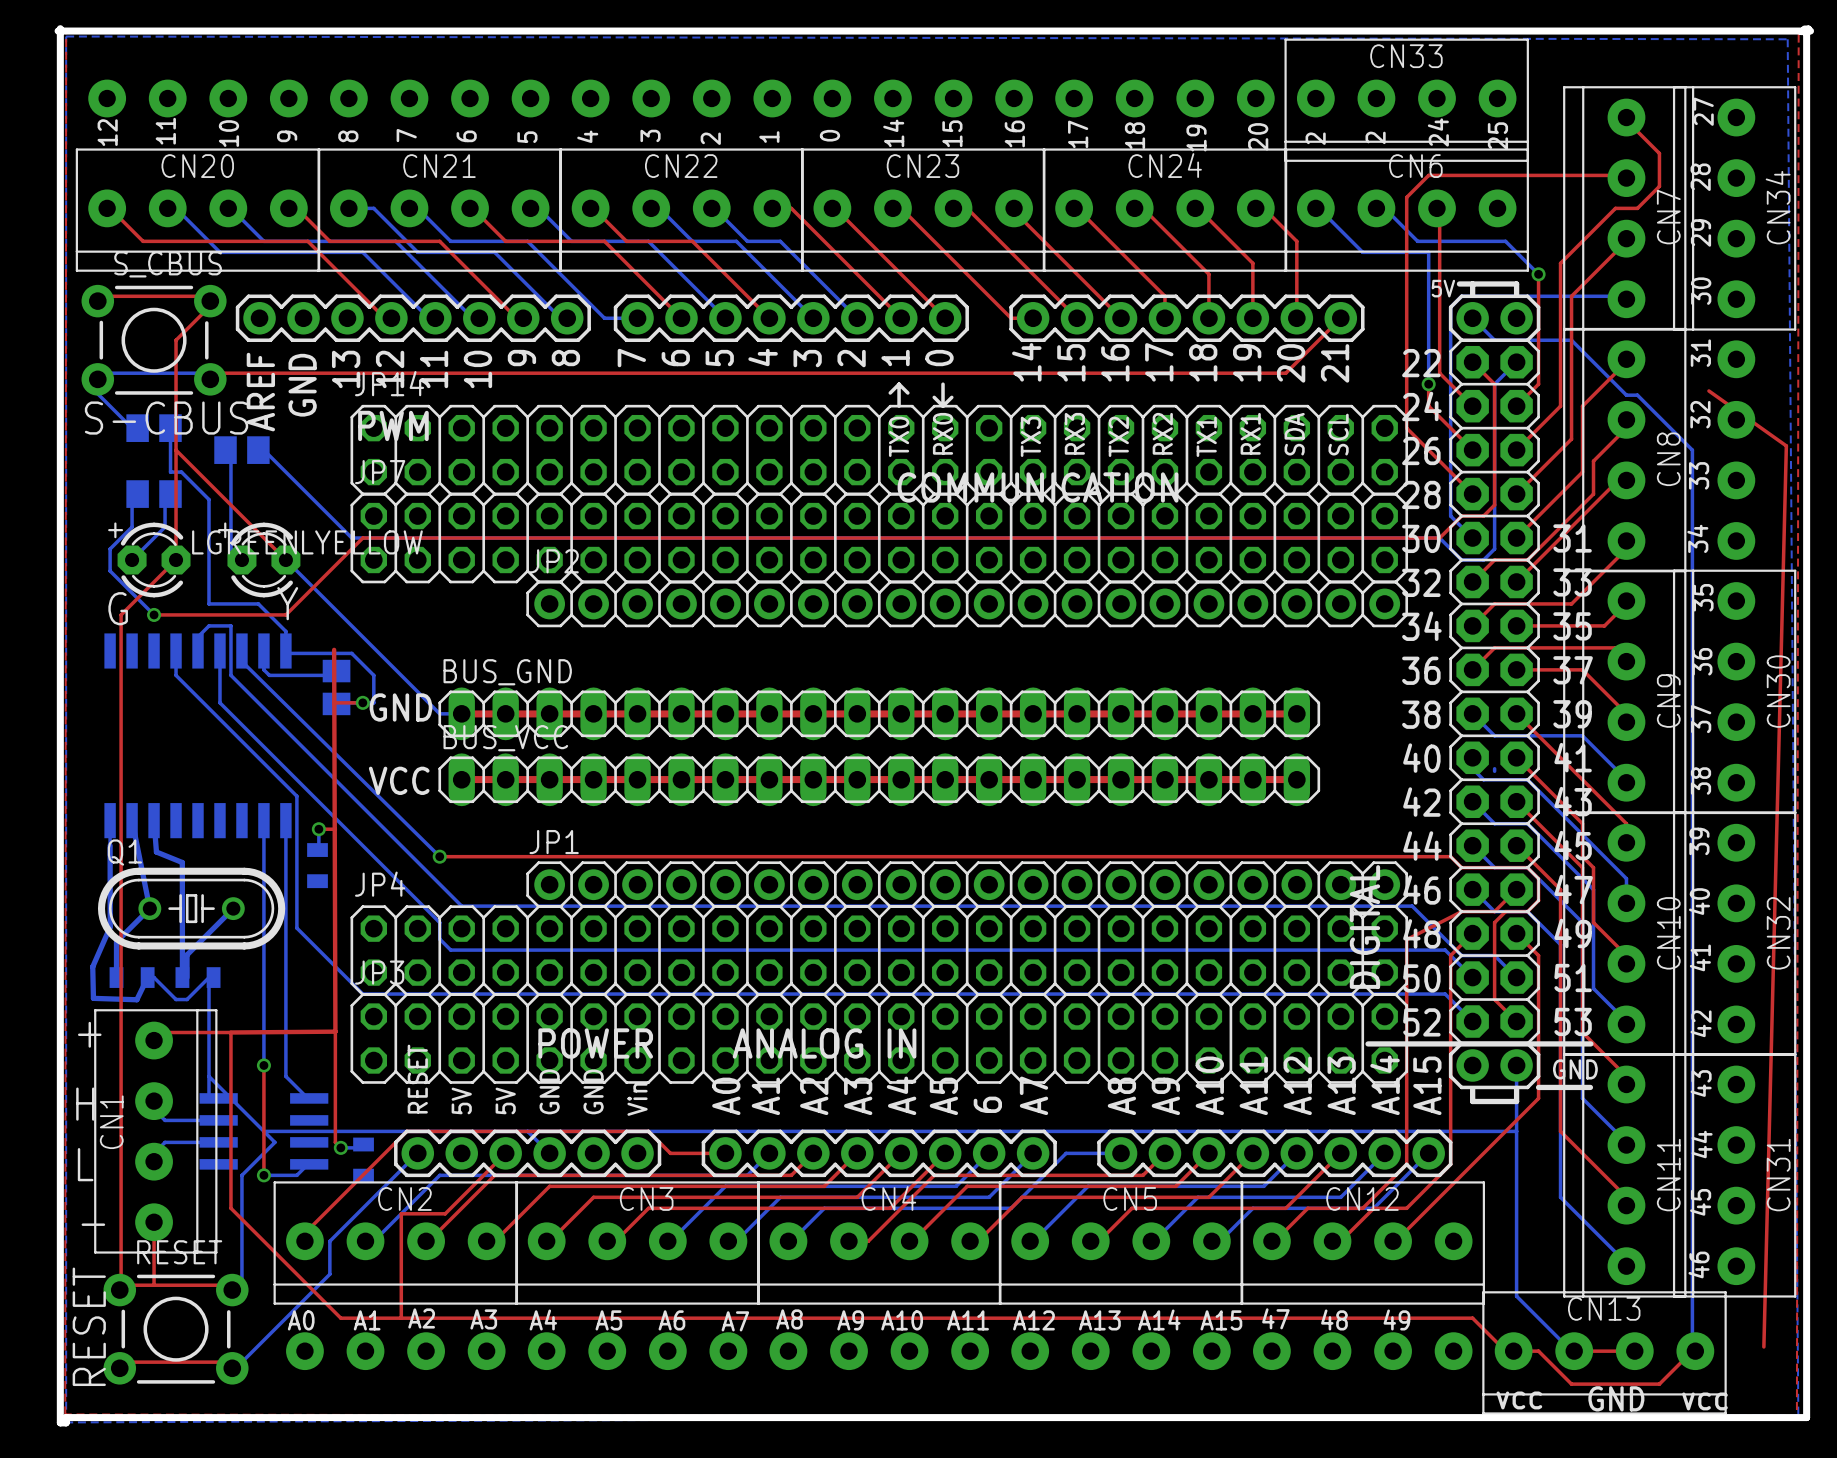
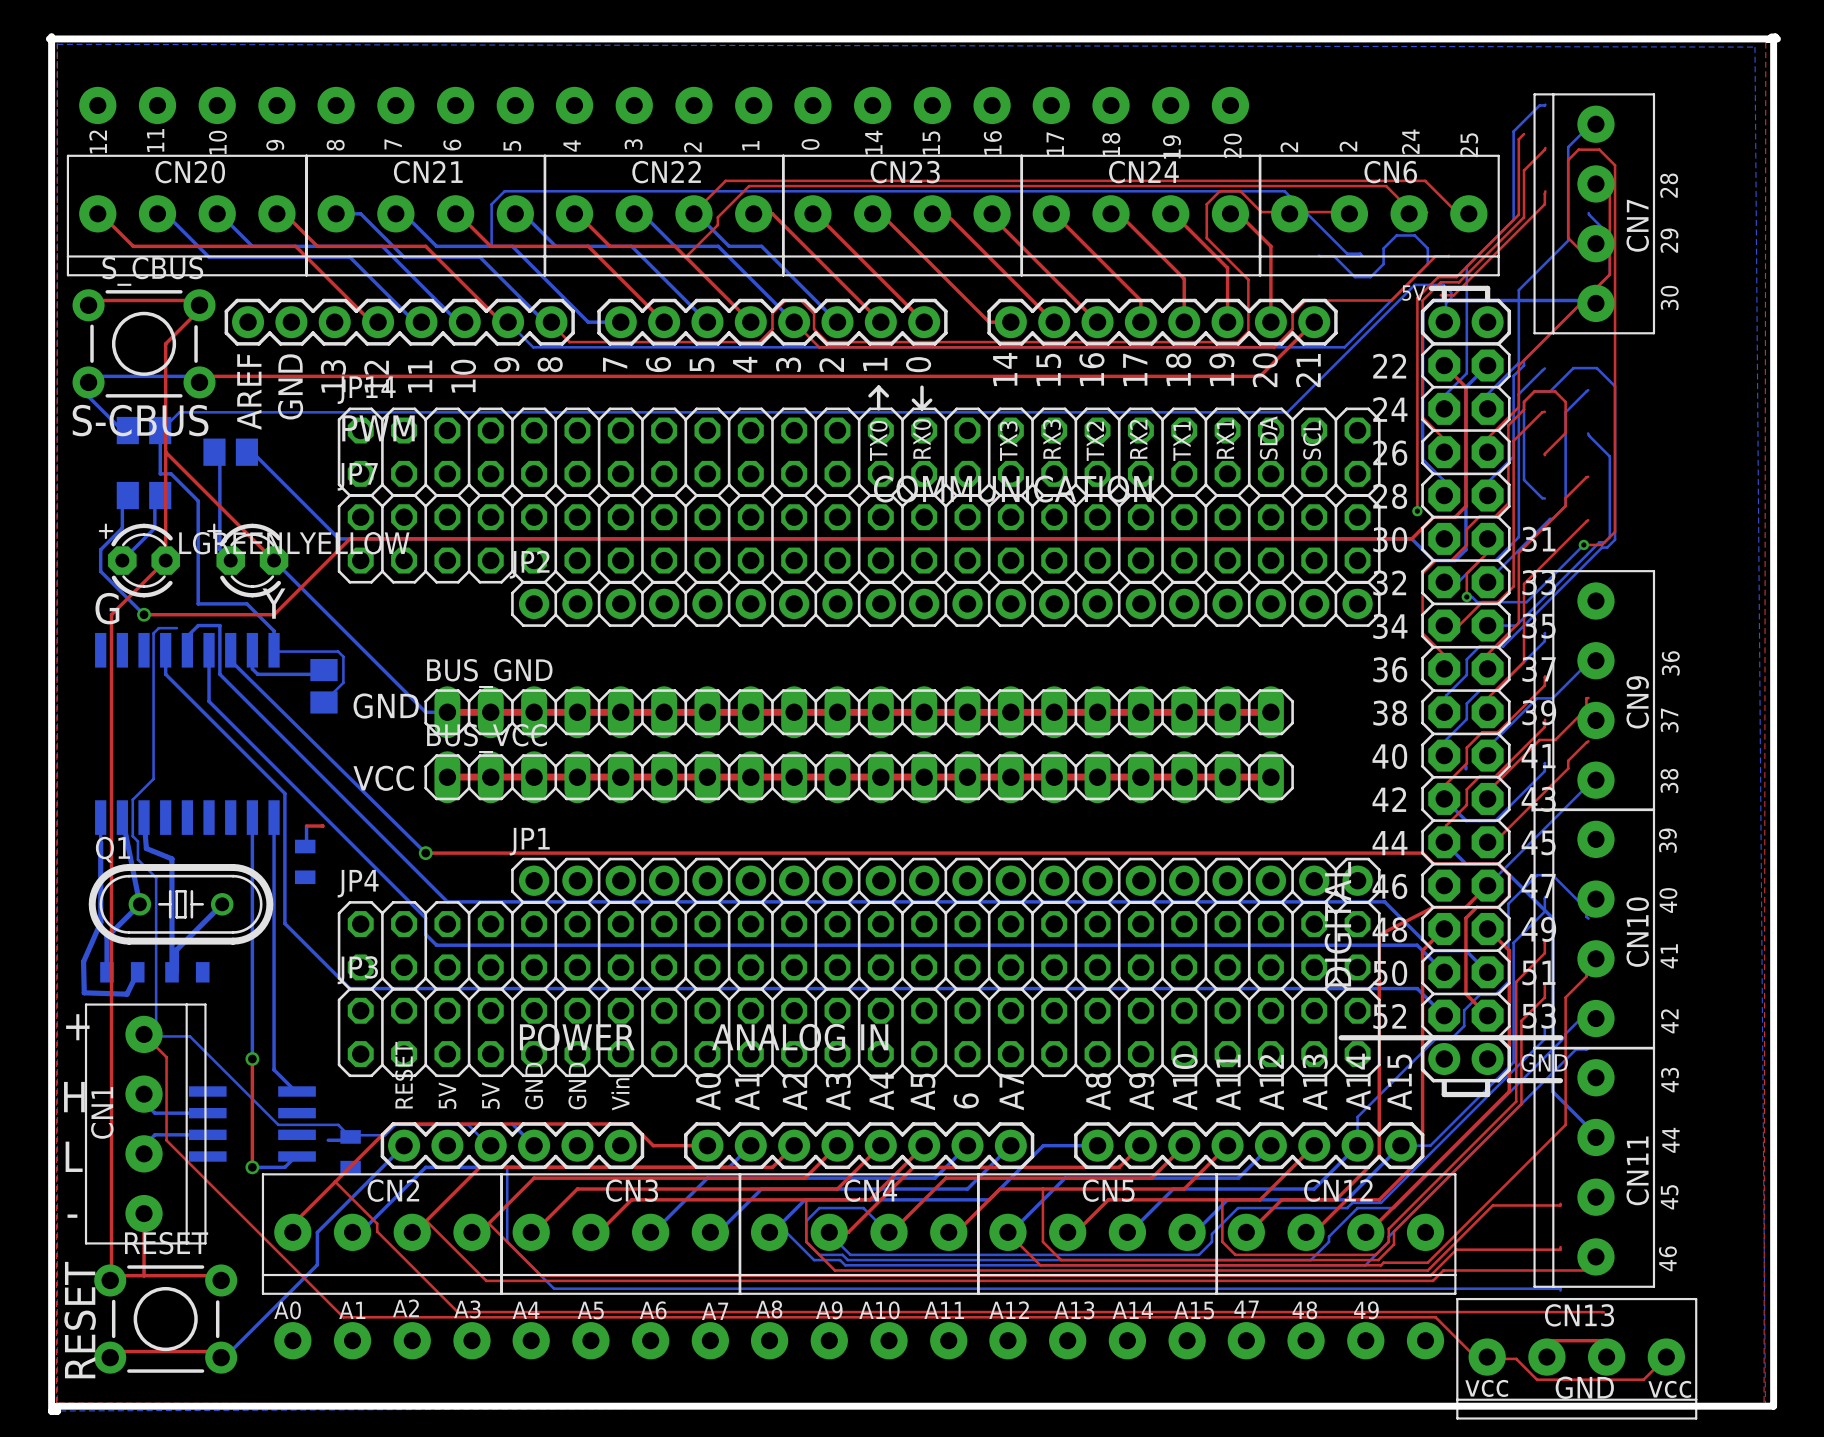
bottom track: none -> (1545, 104) (1539, 105) (1513, 131) (1513, 219) (1466, 266) (1466, 373) (1446, 394) (1446, 407) (1444, 408)
CN33: (1406, 100) -> none
text: 27 (1703, 111) -> none
top track: (1626, 117) (1626, 120) (1659, 153) (1659, 186) (1637, 208) (1615, 208) (1560, 263) (1560, 406) (1516, 450) -> (1588, 169) (1609, 191) (1609, 274) (1518, 365) (1518, 407) (1487, 438) (1487, 452)
bottom track: none -> (1588, 126) (1568, 147) (1568, 240) (1518, 290) (1518, 362) (1487, 394) (1487, 408)
top track: none -> (1524, 134) (1518, 139) (1518, 214) (1456, 277) (1438, 277) (1417, 297) (1417, 511)
top track: (1626, 178) (1626, 175) (1428, 175) (1406, 197) (1406, 428) (1472, 494) -> none
top track: none -> (1545, 191) (1544, 204) (1453, 295) (1440, 295)
top track: none -> (1340, 212) (1261, 212) (1240, 191) (1219, 191) (1206, 204) (1206, 238) (1248, 279) (1248, 331) (1237, 342) (827, 342) (814, 329) (814, 313) (801, 300) (785, 300) (772, 313) (772, 329) (759, 342) (569, 342) (551, 322)
top track: none -> (1427, 212) (1412, 212) (1386, 186) (749, 186) (717, 217) (717, 225) (685, 257)
top track: none -> (1470, 212) (1456, 212) (1425, 180) (725, 180) (693, 213)
bottom track: none -> (1588, 213) (1609, 235) (1609, 274) (1524, 360) (1524, 365) (1513, 375) (1513, 456) (1487, 482) (1487, 495)
bottom track: (1315, 208) (1318, 208) (1362, 252) (1428, 252) (1428, 384) -> none
bottom track: (1376, 208) (1384, 208) (1417, 241) (1505, 241) (1538, 274) -> none
top track: (1436, 208) (1439, 208) (1439, 373) (1472, 406) -> none
CN34: (1734, 208) -> none
top track: (1626, 238) (1626, 241) (1571, 296) (1571, 439) (1516, 494) -> none
bottom track: none -> (491, 246) (491, 204) (504, 191) (1284, 191) (1347, 253) (1360, 253) (1362, 255)
bottom track: none -> (1318, 255) (1334, 256) (1354, 277) (1370, 277) (1383, 264) (1383, 248) (1396, 235) (1414, 235) (1427, 248) (1427, 264) (1344, 347) (533, 347) (508, 322)
top track: none -> (1448, 255) (1435, 256) (1391, 300) (1305, 300) (1292, 313) (1292, 329) (1274, 347) (819, 347) (794, 322)
top track: none -> (1588, 256) (1568, 238) (1568, 160) (1578, 149) (1599, 149) (1615, 165) (1615, 531) (1602, 544) (1583, 544)
top track: (1538, 274) (1538, 384) (1516, 406) -> none
via: (1538, 274) -> none
bottom track: (1472, 318) (1494, 340) (1571, 340) (1626, 395) (1637, 395) (1692, 450) (1692, 1351) (1695, 1351) -> (1444, 322) (1446, 321) (1446, 303) (1451, 297) (1451, 292) (1443, 284) (1414, 284) (1287, 412) (179, 412) (160, 430)
text: 31 (1700, 353) -> none
top track: (1626, 359) (1626, 362) (1582, 406) (1582, 472) (1516, 538) -> (1466, 596) (1466, 573) (1487, 552) (1487, 538)
bottom track: none -> (1544, 368) (1518, 394) (1518, 537) (1495, 560) (1479, 560) (1459, 581) (1444, 582)
top track: (1428, 384) (1428, 406) (1471, 449) -> (1545, 148) (1524, 170) (1524, 217) (1459, 282) (1440, 282) (1422, 300) (1422, 417) (1443, 438) (1443, 451)
via: (1428, 384) -> none
bottom track: none -> (1588, 390) (1565, 412) (1565, 505) (1552, 518) (1550, 518) (1487, 582)
top track: (1708, 390) (1786, 445) (1763, 1346) -> none
text: 32 (1700, 414) -> none
top track: (1626, 419) (1626, 428) (1593, 461) (1593, 494) (1527, 560) (1494, 560) (1472, 581) -> none
bottom track: none -> (1588, 433) (1609, 456) (1609, 537) (1604, 542) (1599, 542) (1516, 625) (1487, 625)
CN8: (1624, 450) -> none
part: (1736, 450) -> none
bottom track: (1450, 457) (1450, 516) (1472, 538) -> (1422, 459) (1443, 479) (1444, 495)
text: 33 (1699, 475) -> none
top track: (1626, 480) (1626, 472) (1516, 581) -> none
via: none -> (1417, 511)
text: 34 (1697, 538) -> none
top track: (1626, 540) (1626, 549) (1571, 603) (1494, 603) (1472, 625) -> (1544, 411) (1513, 440) (1513, 586) (1498, 602) (1482, 602) (1459, 625) (1444, 625)
bottom track: none -> (1583, 544) (1526, 602) (1477, 602) (1472, 596) (1466, 596)
via: none -> (1583, 544)
via: none -> (1466, 596)
text: 35 (1703, 597) -> none
top track: (1626, 601) (1626, 603) (1604, 625) (1516, 625) -> none
bottom track: none -> (176, 628) (158, 628) (153, 633) (153, 779) (132, 799) (132, 836) (137, 841) (137, 859) (156, 877) (156, 1036) (144, 1034) (145, 1036) (189, 1036) (278, 1124) (338, 1124) (350, 1136) (351, 1135) (385, 1135) (395, 1124) (468, 1124) (490, 1145)
top track: (334, 649) (335, 1031) -> none
bottom track: (285, 650) (285, 653) (351, 653) (373, 675) (373, 702) (336, 703) -> (274, 650) (338, 651) (343, 656) (343, 682) (323, 702)
bottom track: none -> (1588, 654) (1586, 656) (1586, 664) (1552, 698) (1537, 698) (1487, 747) (1487, 755)
top track: (1626, 661) (1626, 658) (1615, 647) (1494, 647) (1472, 669) -> (1544, 455) (1565, 433) (1565, 401) (1555, 391) (1534, 391) (1524, 401) (1524, 409) (1508, 425) (1508, 503) (1495, 516) (1479, 516) (1466, 529) (1466, 544) (1451, 560) (1435, 560) (1422, 573) (1422, 633) (1443, 654) (1444, 668)
top track: (1516, 669) (1582, 669) (1626, 713) (1626, 722) -> (1487, 668) (1487, 654) (1518, 622) (1518, 552) (1565, 505) (1565, 498) (1588, 476)
top track: none -> (1545, 676) (1544, 685) (1498, 732) (1482, 732) (1466, 747) (1466, 763) (1446, 784) (1446, 797) (1444, 798)
CN30: (1734, 691) -> none
top track: (334, 702) (362, 702) -> none
via: (362, 702) -> none
bottom track: (1472, 713) (1494, 735) (1582, 735) (1626, 779) (1626, 782) -> (1444, 712) (1446, 711) (1446, 695) (1466, 674) (1466, 659) (1479, 646) (1503, 646) (1602, 547) (1607, 547) (1615, 539) (1615, 386) (1596, 368) (1573, 368) (1550, 391) (1534, 391) (1524, 401) (1524, 479) (1544, 498)
top track: (1516, 713) (1626, 823) (1626, 842) -> (1487, 712) (1487, 698) (1524, 661) (1524, 583) (1588, 520)
top track: none -> (1545, 719) (1544, 726) (1495, 776) (1479, 776) (1466, 789) (1466, 805) (1446, 825) (1446, 841) (1444, 842)
bottom track: (1472, 757) (1472, 768) (1483, 779) (1527, 779) (1626, 878) (1626, 903) -> (1444, 755) (1446, 755) (1446, 739) (1466, 719) (1466, 703) (1479, 690) (1495, 690) (1544, 641) (1545, 632)
top track: (1516, 757) (1582, 823) (1582, 856) (1593, 867) (1593, 922) (1626, 955) (1626, 963) -> none
bottom track: none -> (1588, 784) (1487, 885)
top track: (1516, 801) (1582, 867) (1582, 1032) (1626, 1076) (1626, 1084) -> (1487, 798) (1487, 792) (1539, 739) (1555, 739) (1586, 708) (1586, 698) (1588, 698)
bottom track: (1524, 823) (1527, 823) (1593, 889) (1593, 988) (1626, 1021) (1626, 1024) -> (1495, 820) (1544, 771) (1545, 763)
via: (318, 829) -> none
top track: (1516, 845) (1560, 889) (1560, 1131) (1626, 1197) (1626, 1205) -> (1487, 842) (1495, 841) (1568, 768) (1568, 760) (1588, 741)
bottom track: (1472, 889) (1494, 911) (1527, 911) (1560, 944) (1560, 1197) (1626, 1263) (1626, 1266) -> none
bottom track: none -> (1545, 896) (1544, 911) (1513, 942) (1513, 1062) (1430, 1145) (1400, 1145)
bottom track: none -> (1588, 918) (1586, 916) (1586, 909) (1552, 875) (1537, 875) (1508, 903) (1508, 981) (1495, 994) (1479, 994) (1464, 1010) (1464, 1026) (1451, 1039) (1435, 1039) (1357, 1117) (1357, 1145)
CN32: (1734, 933) -> none
top track: none -> (1545, 940) (1544, 953) (1516, 981) (1516, 1101) (1388, 1228) (1388, 1241) (1375, 1254) (1235, 1254) (1222, 1241) (1222, 1199)
top track: none -> (1588, 961) (1586, 963) (1586, 976) (1565, 997) (1565, 1124) (1427, 1262) (1383, 1262) (1381, 1265) (1040, 1265) (1007, 1232)
bottom track: (147, 977) (154, 977) (176, 999) (187, 999) (208, 977) -> none
bottom track: (208, 977) (208, 1098) (218, 1098) -> none
top track: none -> (1545, 983) (1544, 997) (1521, 1020) (1521, 1104) (1394, 1231) (1394, 1244) (1378, 1260) (1061, 1260) (1042, 1241) (1042, 1189)
bottom track: none -> (1588, 1005) (1586, 1013) (1565, 1033) (1565, 1036) (1394, 1208) (1357, 1208) (1328, 1236) (1328, 1241) (1310, 1260) (847, 1260) (842, 1254) (819, 1254) (806, 1241) (806, 1221) (819, 1208) (863, 1208) (889, 1232)
top track: (335, 1031) (335, 1142) (340, 1147) -> none
top track: (335, 1031) (230, 1032) -> none
top track: (230, 1032) (154, 1032) (154, 1040) -> (1666, 1357) (1643, 1379) (1537, 1379) (1516, 1358) (1487, 1358) (1485, 1356) (1474, 1356) (1435, 1317) (343, 1317) (166, 1140) (166, 1057) (144, 1034)
top track: (230, 1032) (230, 1208) (340, 1318) (1472, 1318) (1505, 1351) (1538, 1351) (1571, 1384) (1659, 1384) (1692, 1351) (1695, 1351) -> none
bottom track: none -> (1545, 1026) (1544, 1039) (1381, 1202) (1352, 1202) (1347, 1208) (1237, 1208) (1211, 1234) (1211, 1241) (1198, 1254) (850, 1254) (829, 1232)
bottom track: none -> (1588, 1048) (1576, 1049) (1388, 1236) (1388, 1241) (1365, 1265) (845, 1265) (840, 1260) (814, 1260) (780, 1226) (769, 1232)
bottom track: (1516, 1065) (1516, 1296) (1571, 1351) (1574, 1351) -> none
bottom track: (208, 1076) (274, 1142) (241, 1175) (241, 1285) (232, 1290) -> none
bottom track: (263, 1131) (1516, 1131) -> none
via: (340, 1147) -> none
top track: (505, 1153) (445, 1213) (401, 1213) (401, 1318) -> none
bottom track: none -> (507, 1166) (507, 1241) (554, 1288) (1560, 1288) (1560, 1290)
CN31: (1734, 1175) -> none
top track: none -> (335, 1181) (377, 1223) (377, 1231) (457, 1312) (1603, 1312)
top track: none -> (806, 1199) (806, 1241) (834, 1270) (1427, 1270) (1492, 1205) (1560, 1205) (1560, 1203)
top track: none -> (412, 1232) (426, 1221) (486, 1280) (1433, 1280) (1443, 1270) (1602, 1270) (1603, 1268)
top track: none -> (471, 1232) (489, 1223) (541, 1275) (1430, 1275) (1456, 1249) (1560, 1249) (1560, 1247)
CN13 position: (1604, 1352) -> (1576, 1358)

